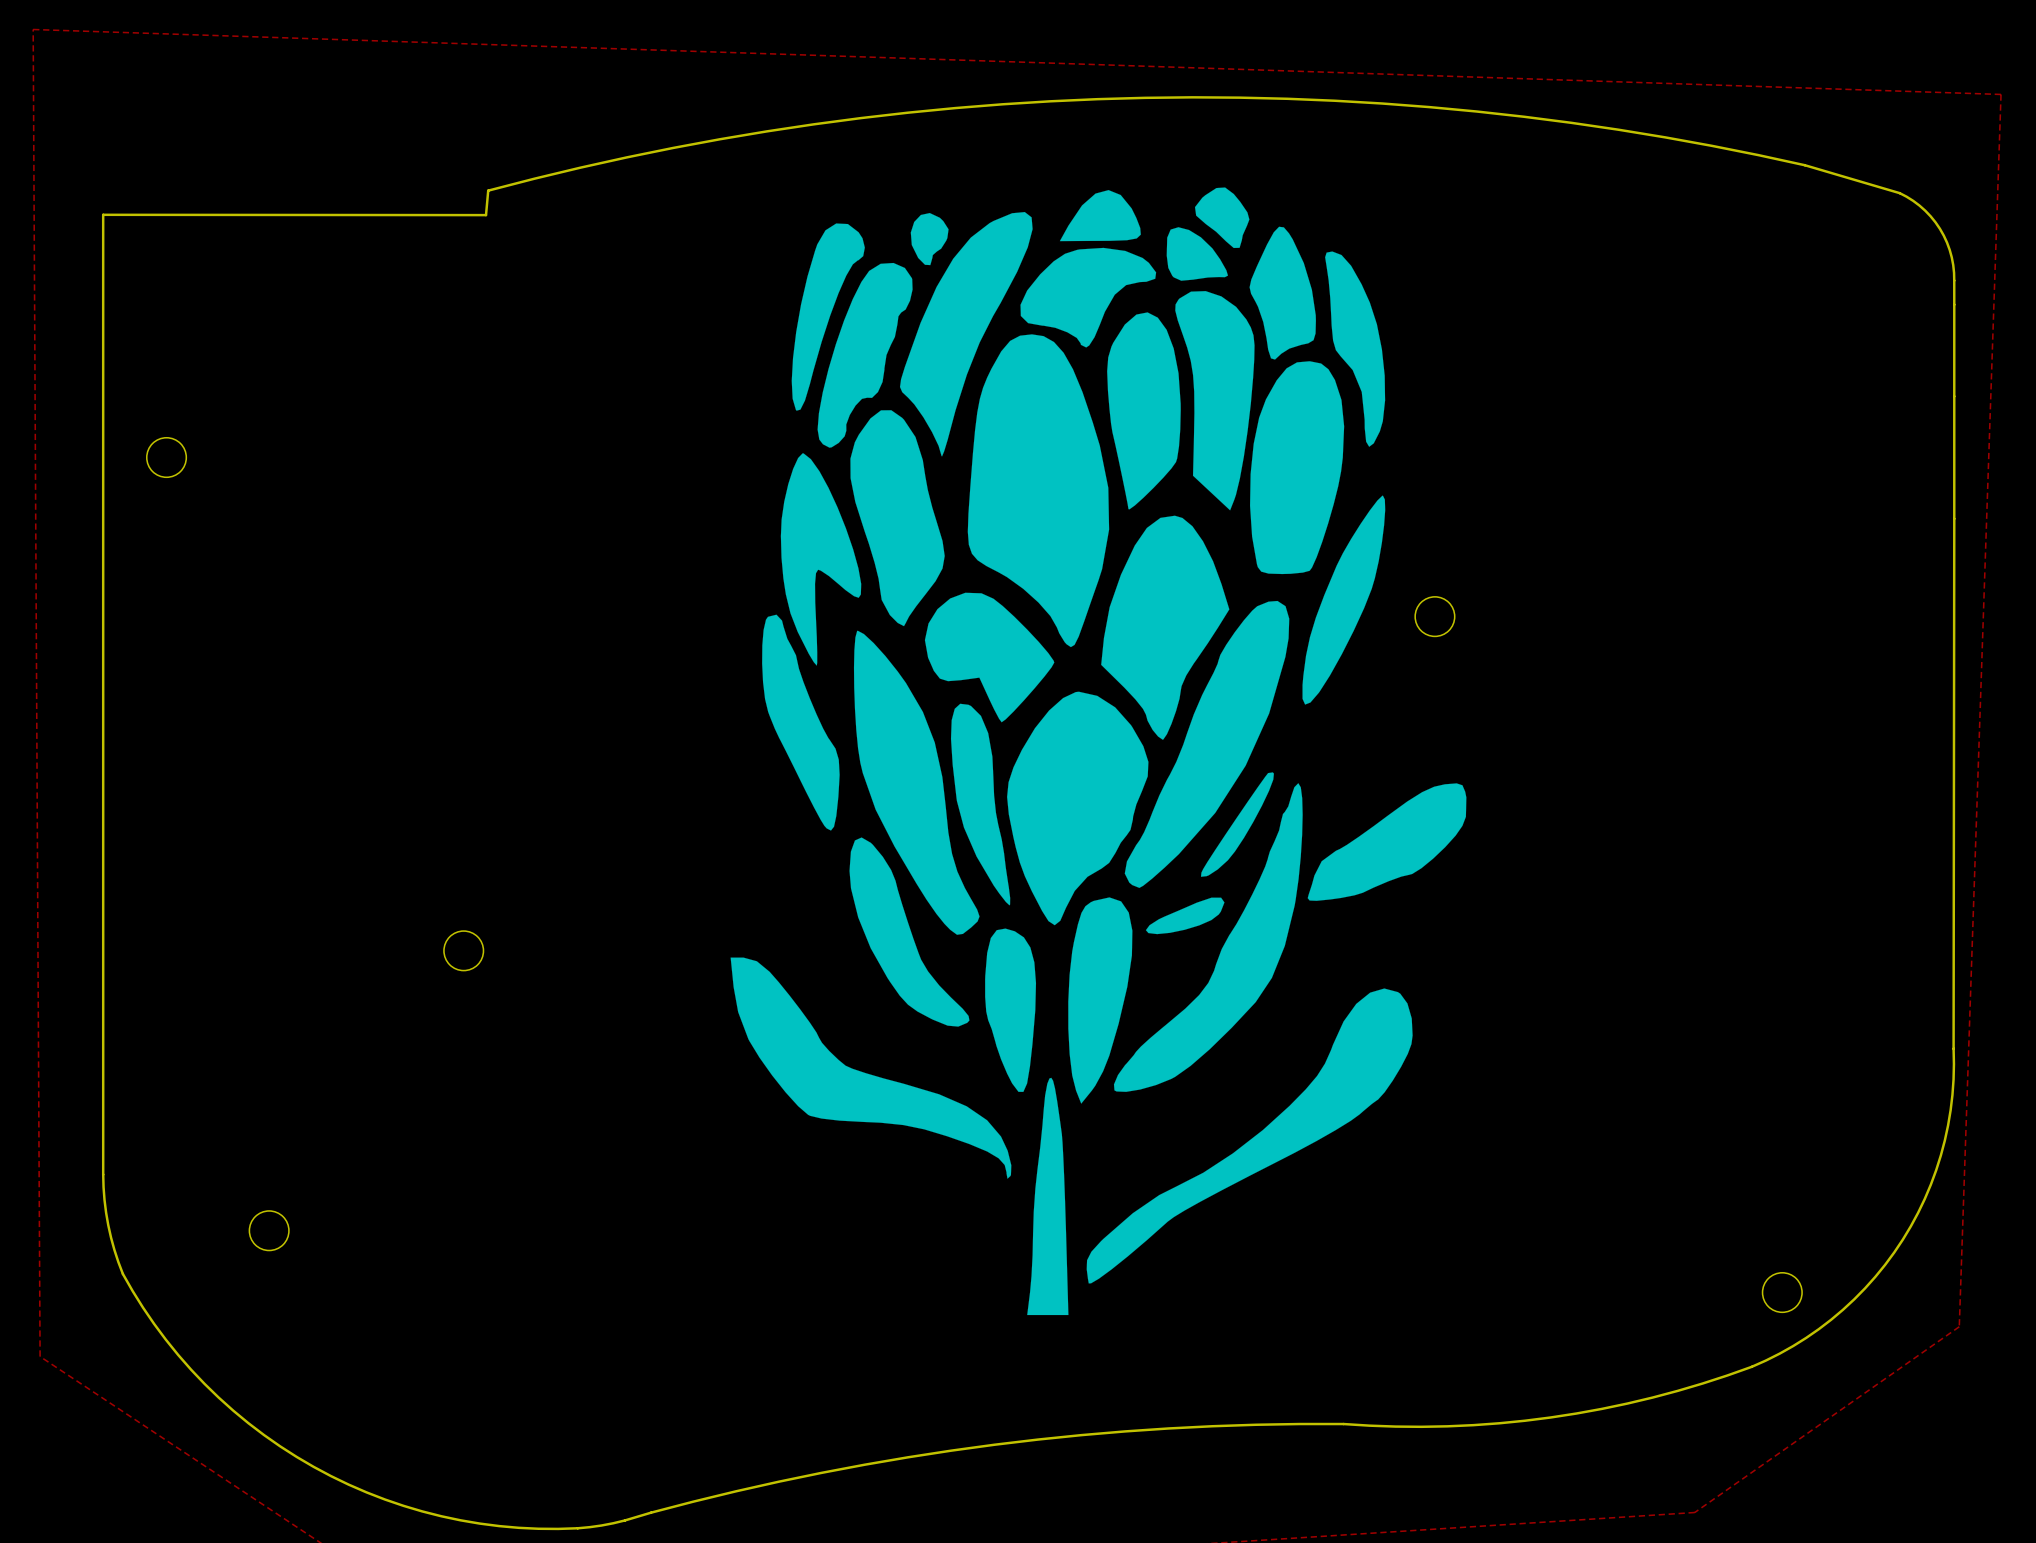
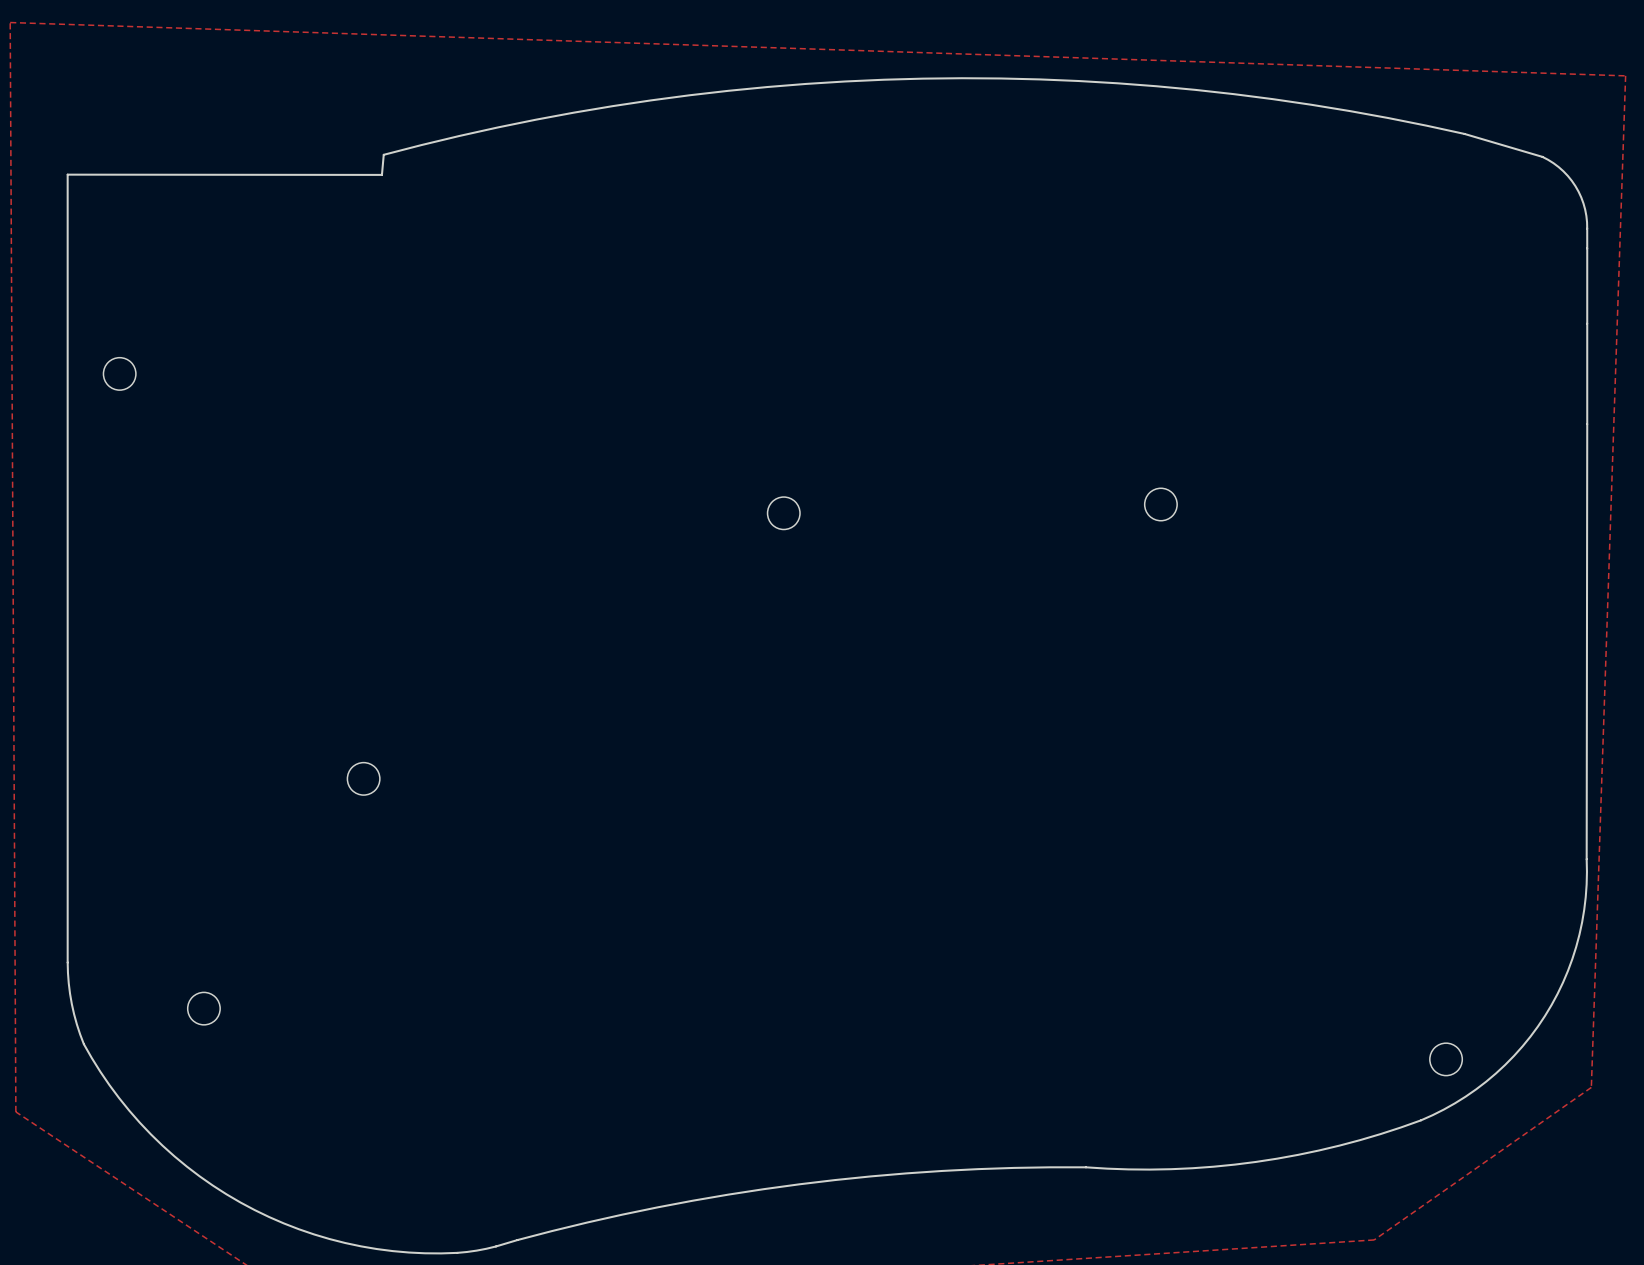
drawing: [730, 187, 1467, 1316] -> none

